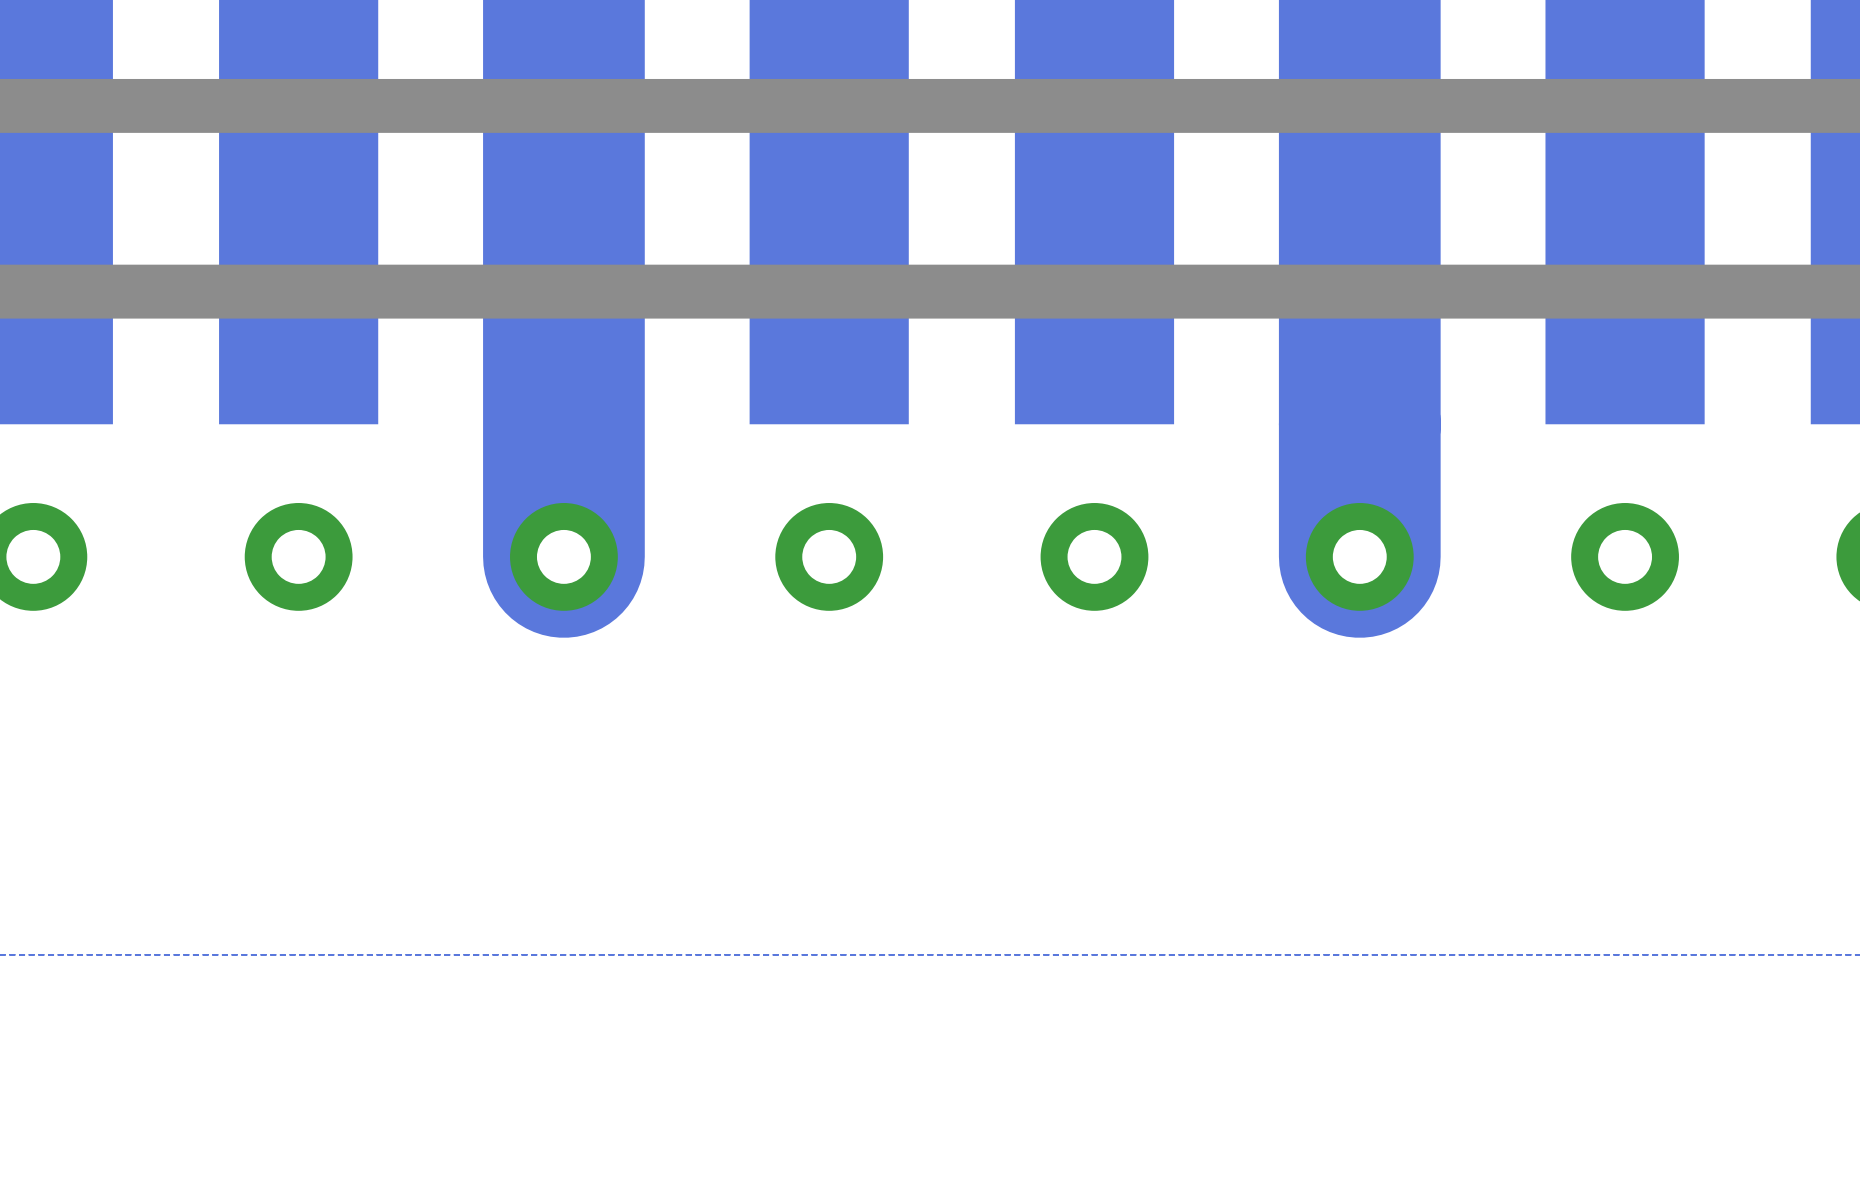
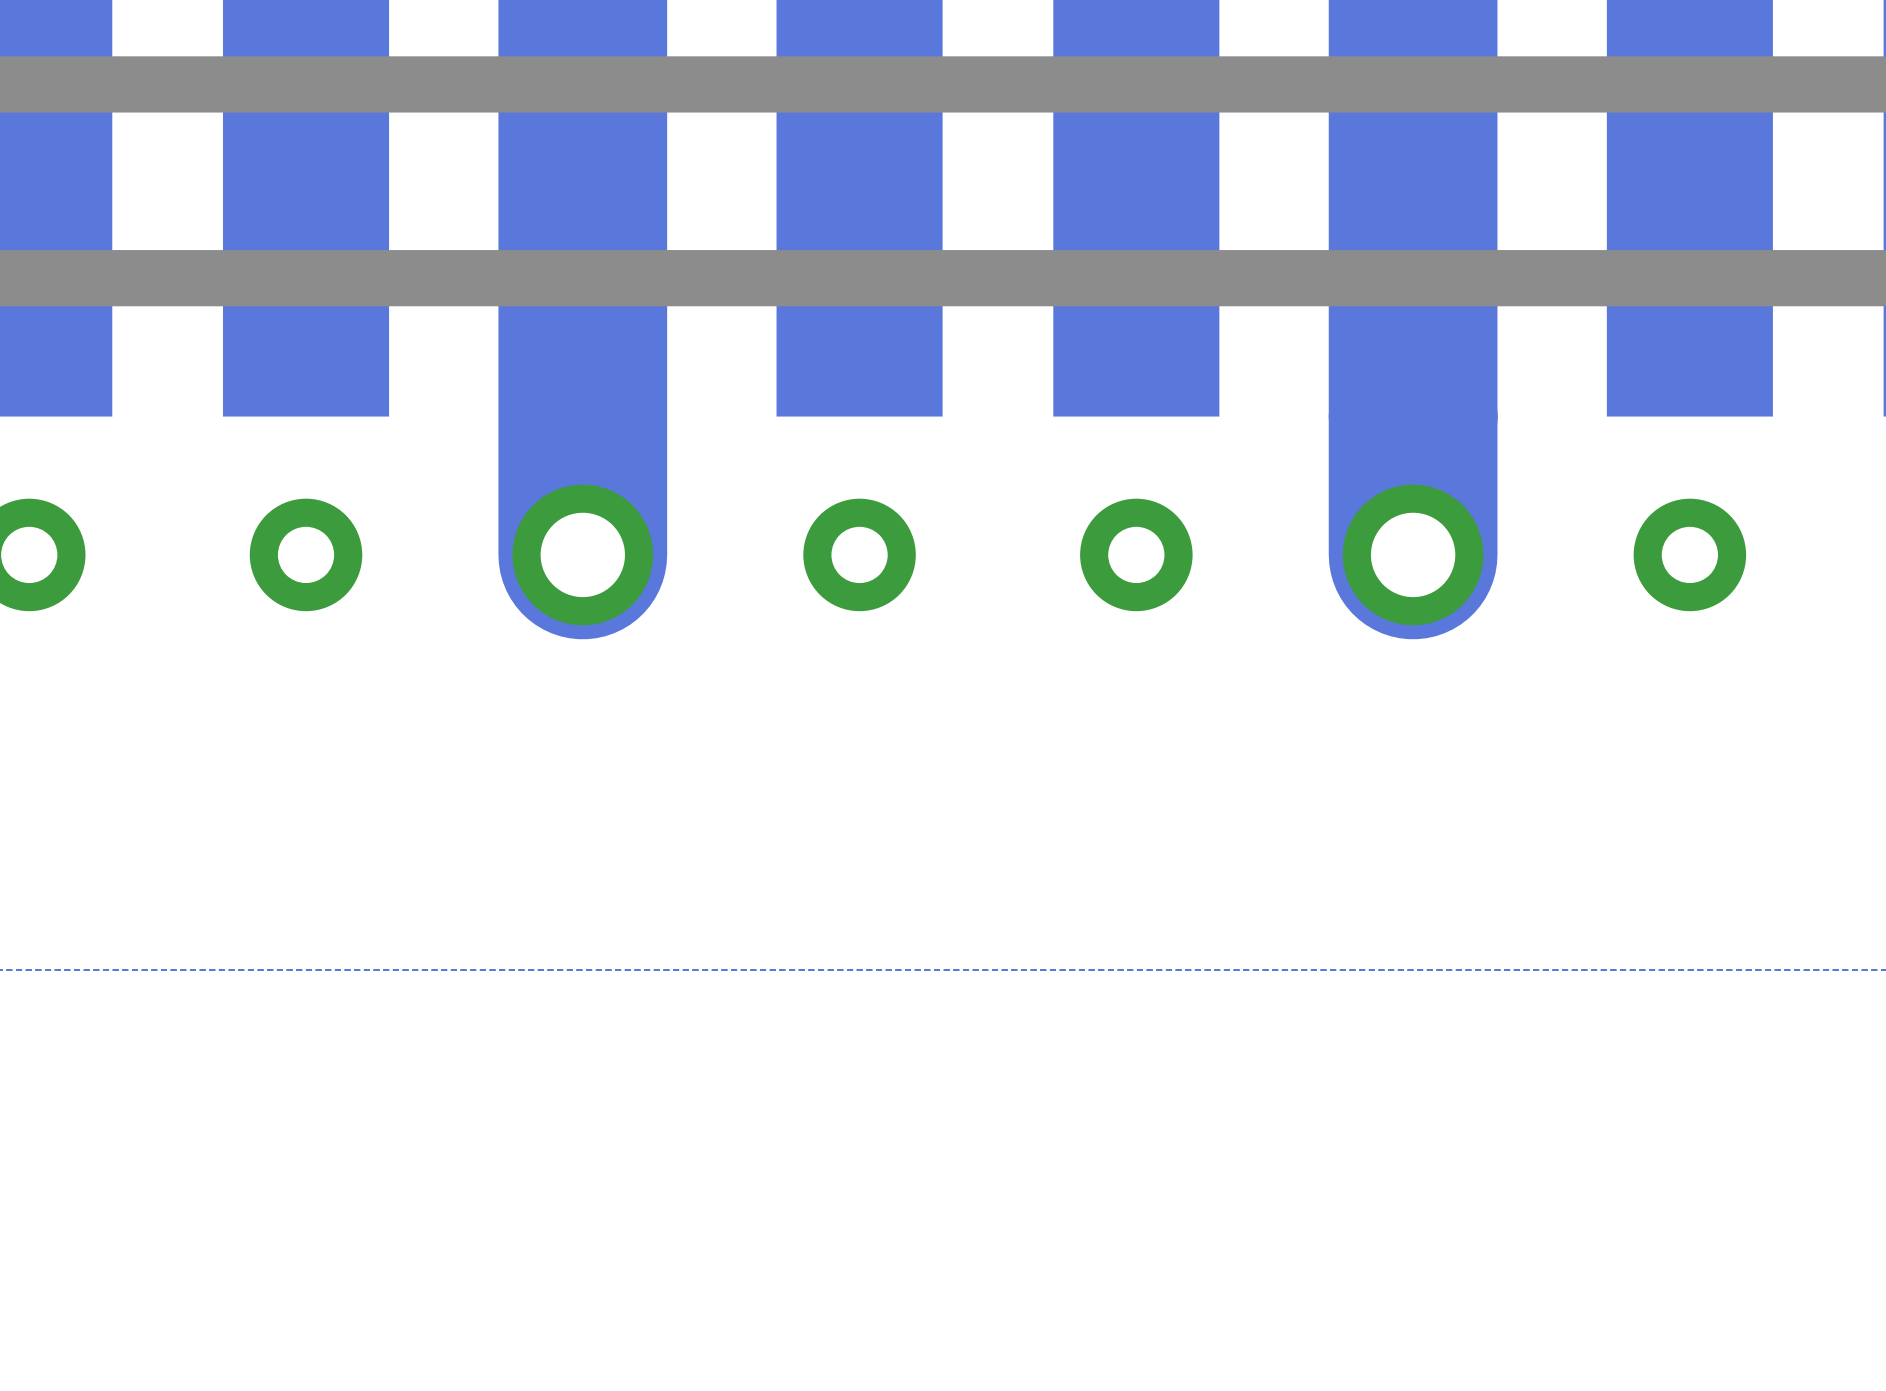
via size: [510, 503, 618, 611] -> [512, 484, 654, 626]
via size: [1305, 503, 1414, 611] -> [1342, 484, 1484, 626]

